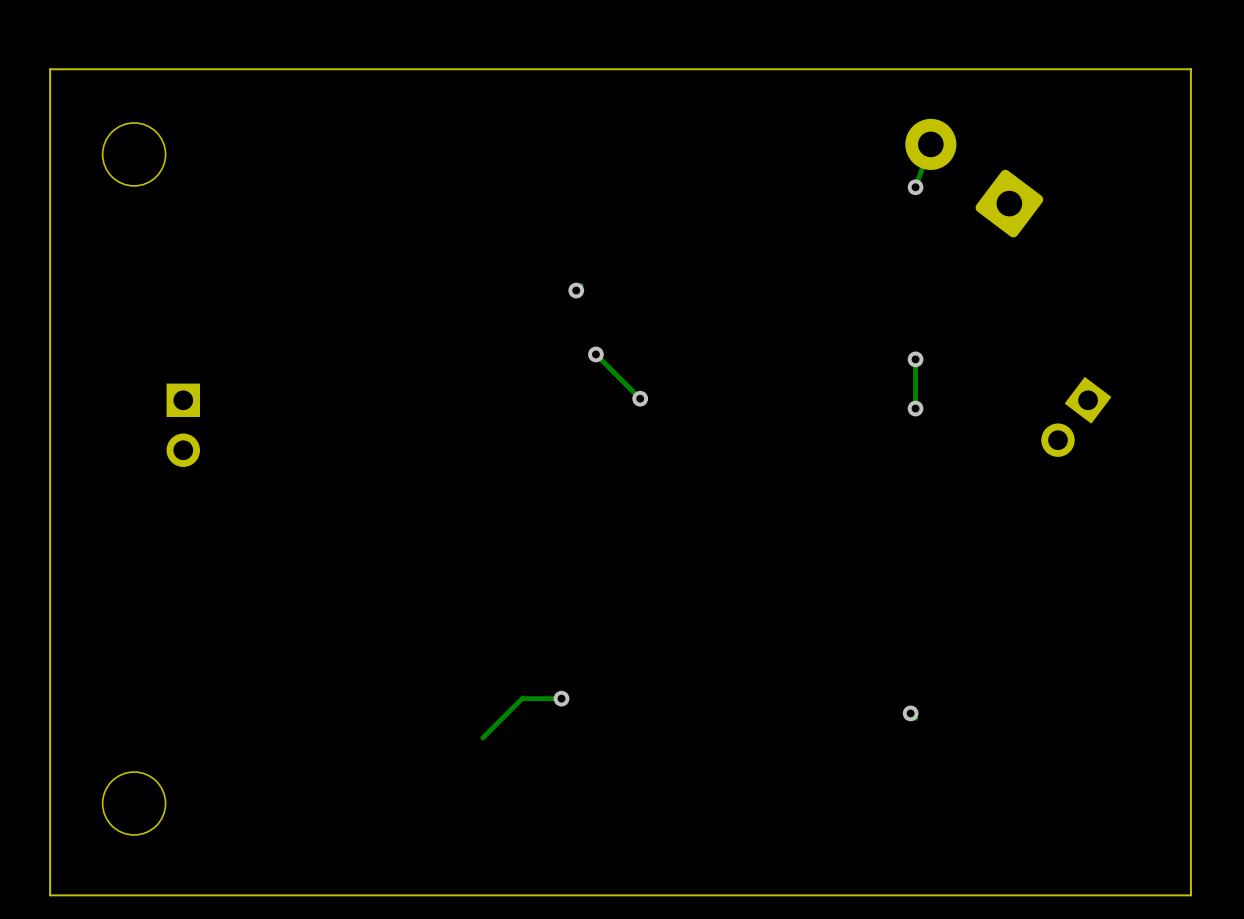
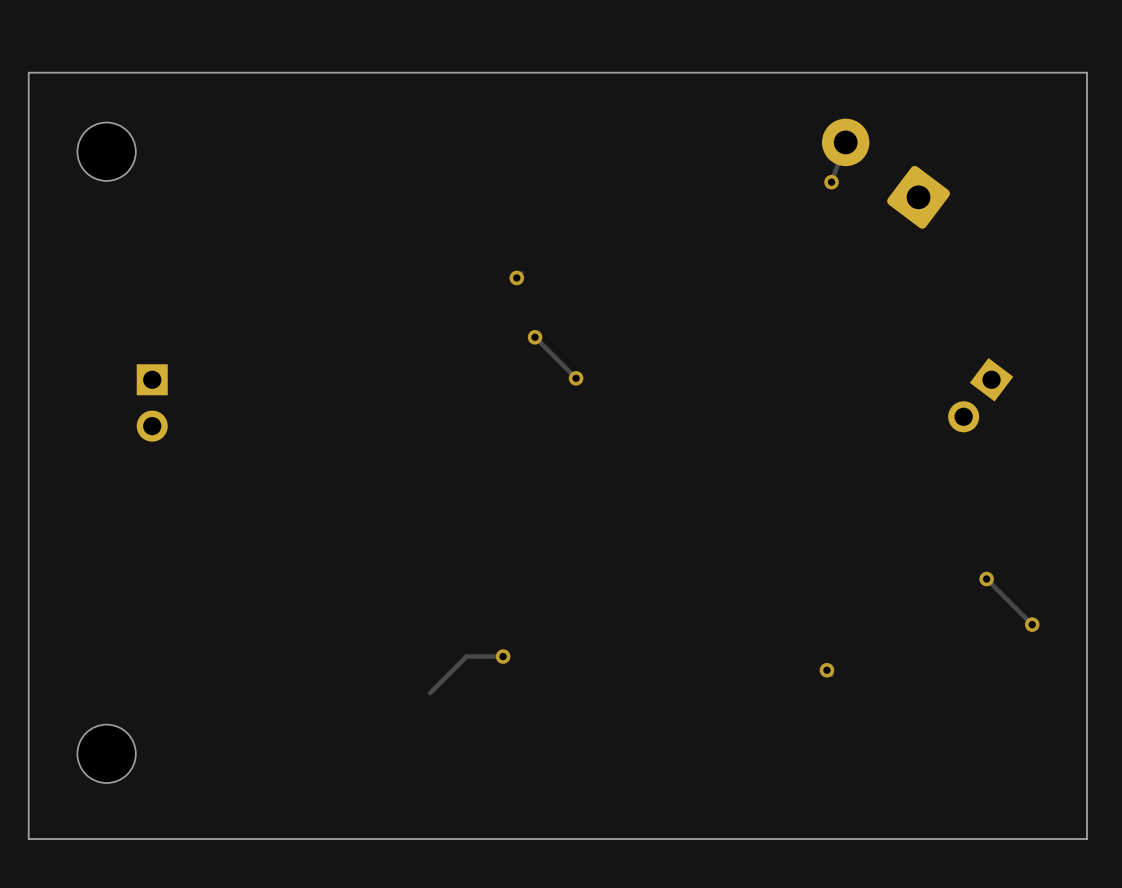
track: (915, 359) (915, 408) -> none
via: (915, 359) -> none
via: (915, 408) -> none
track: none -> (986, 579) (1032, 624)
via: none -> (986, 579)
via: none -> (1032, 624)

